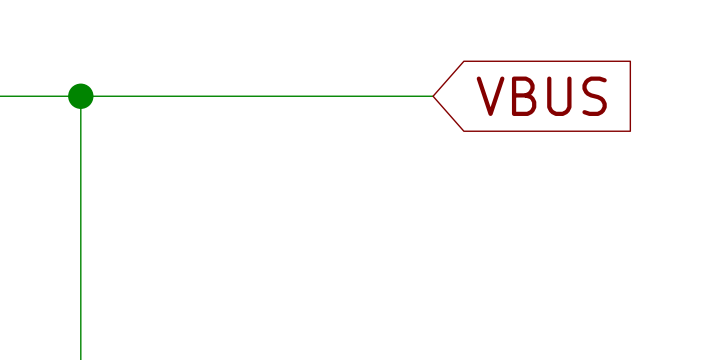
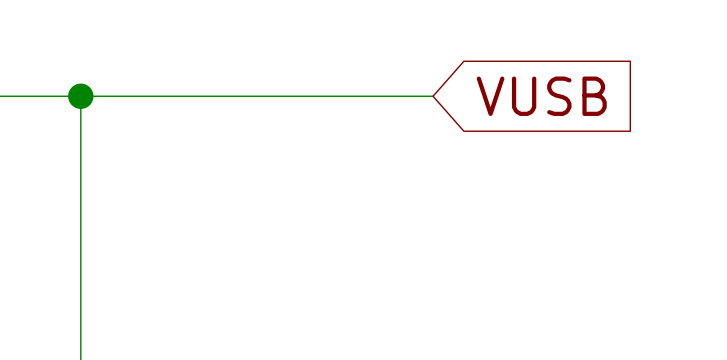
global label: VBUS (541, 96) -> VUSB (541, 96)

